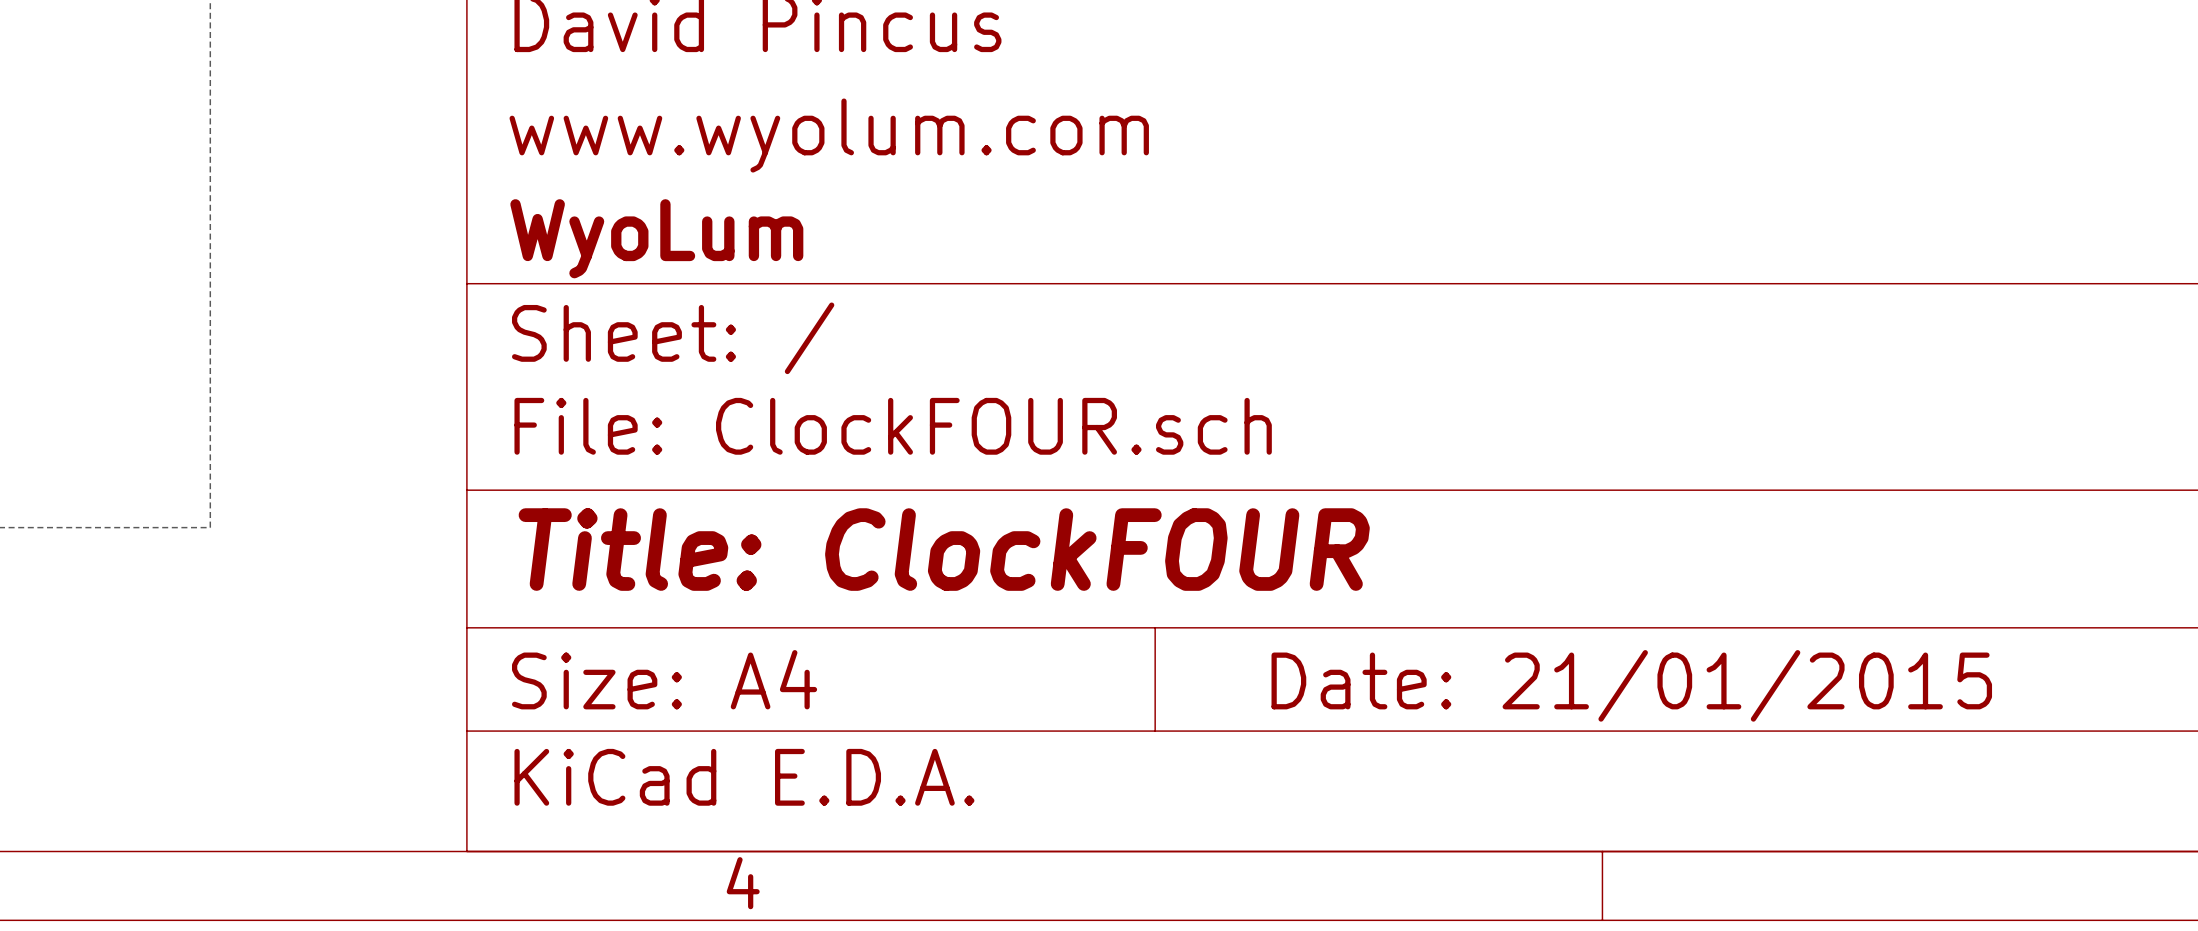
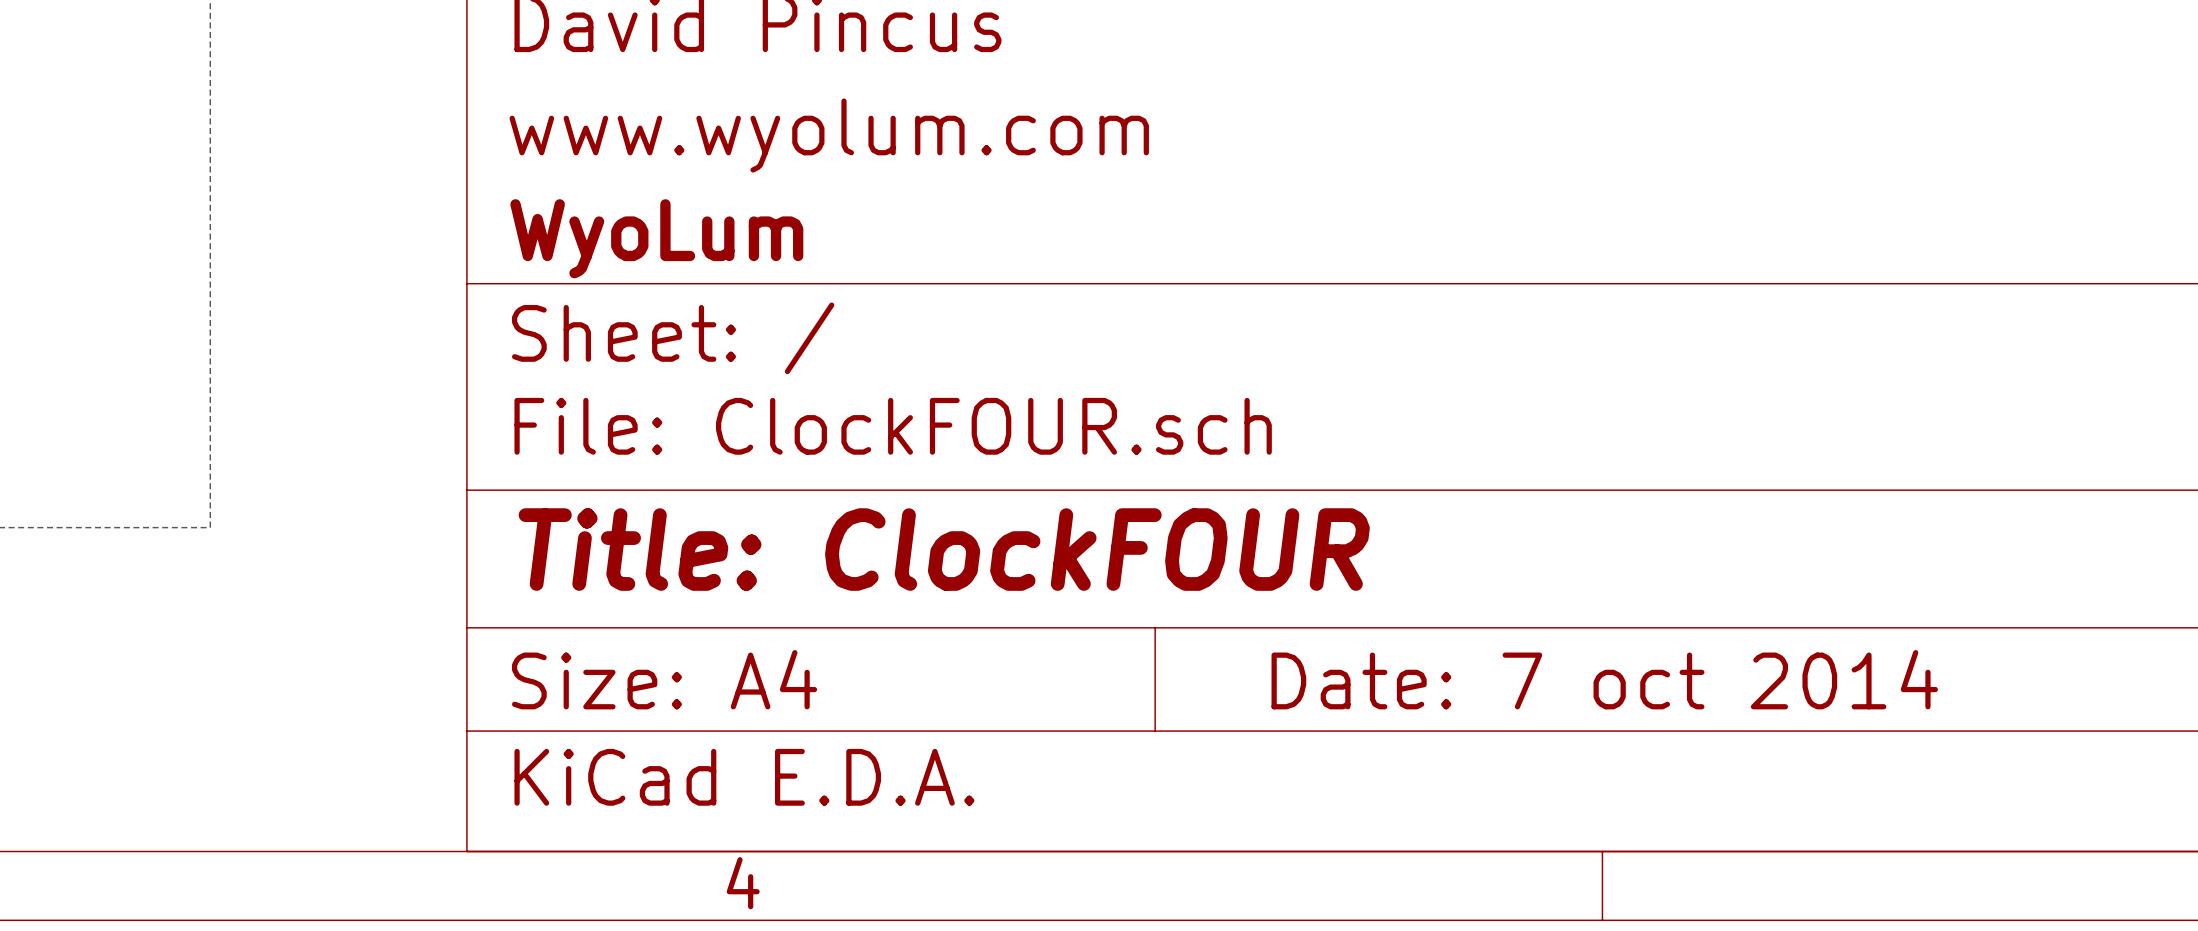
title block: Date: 21/01/2015 (1631, 685) -> Date: 7 oct 2014 (1604, 679)

